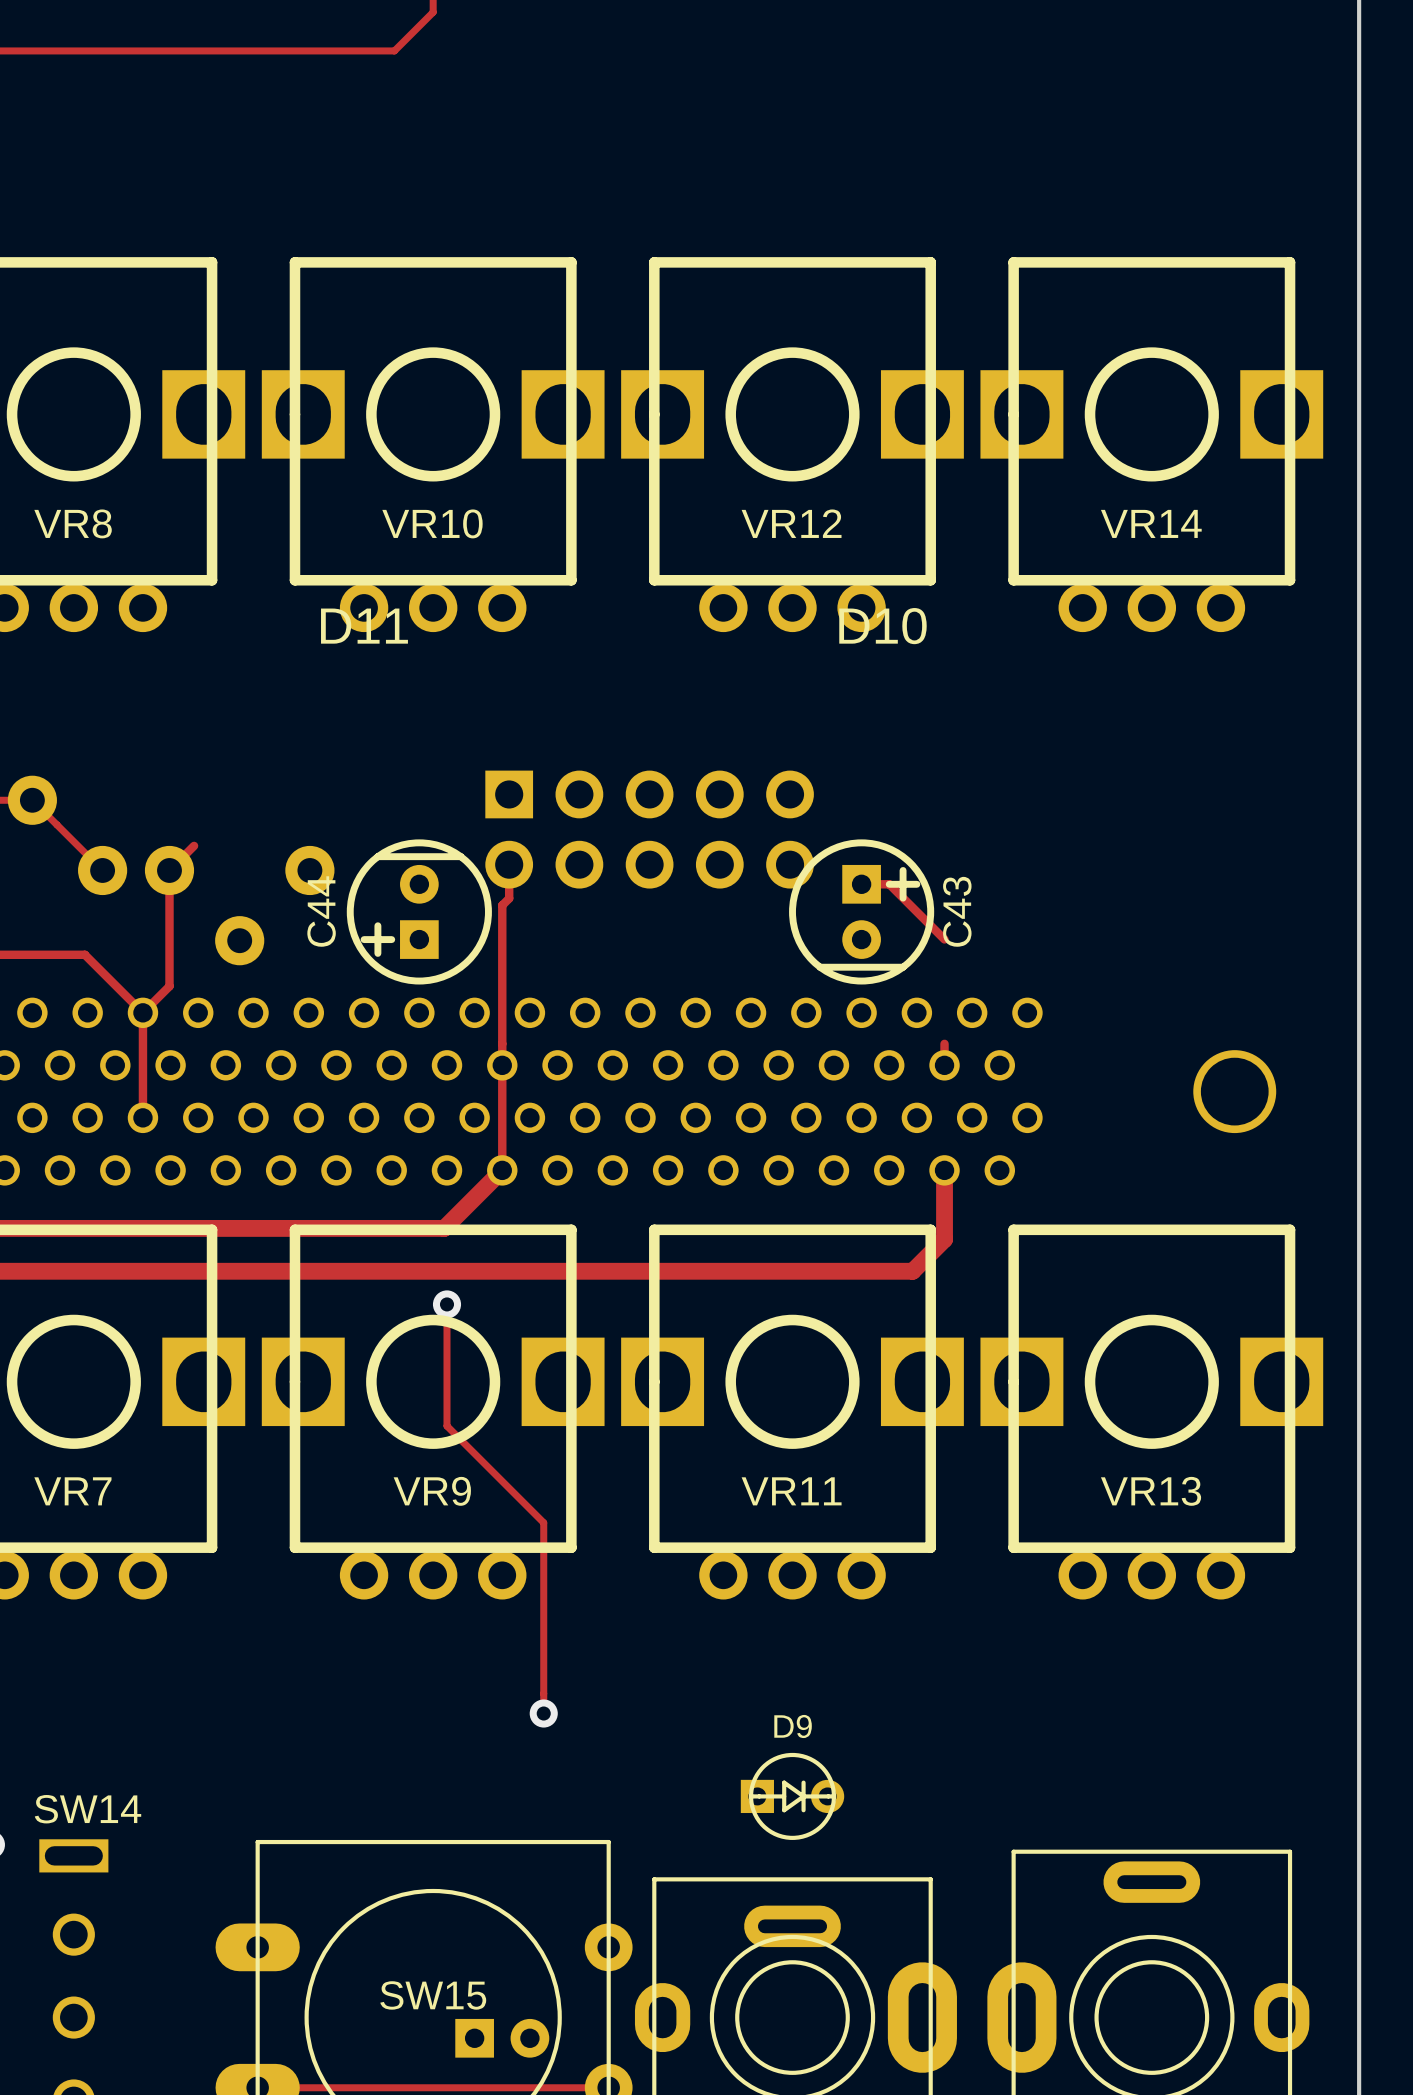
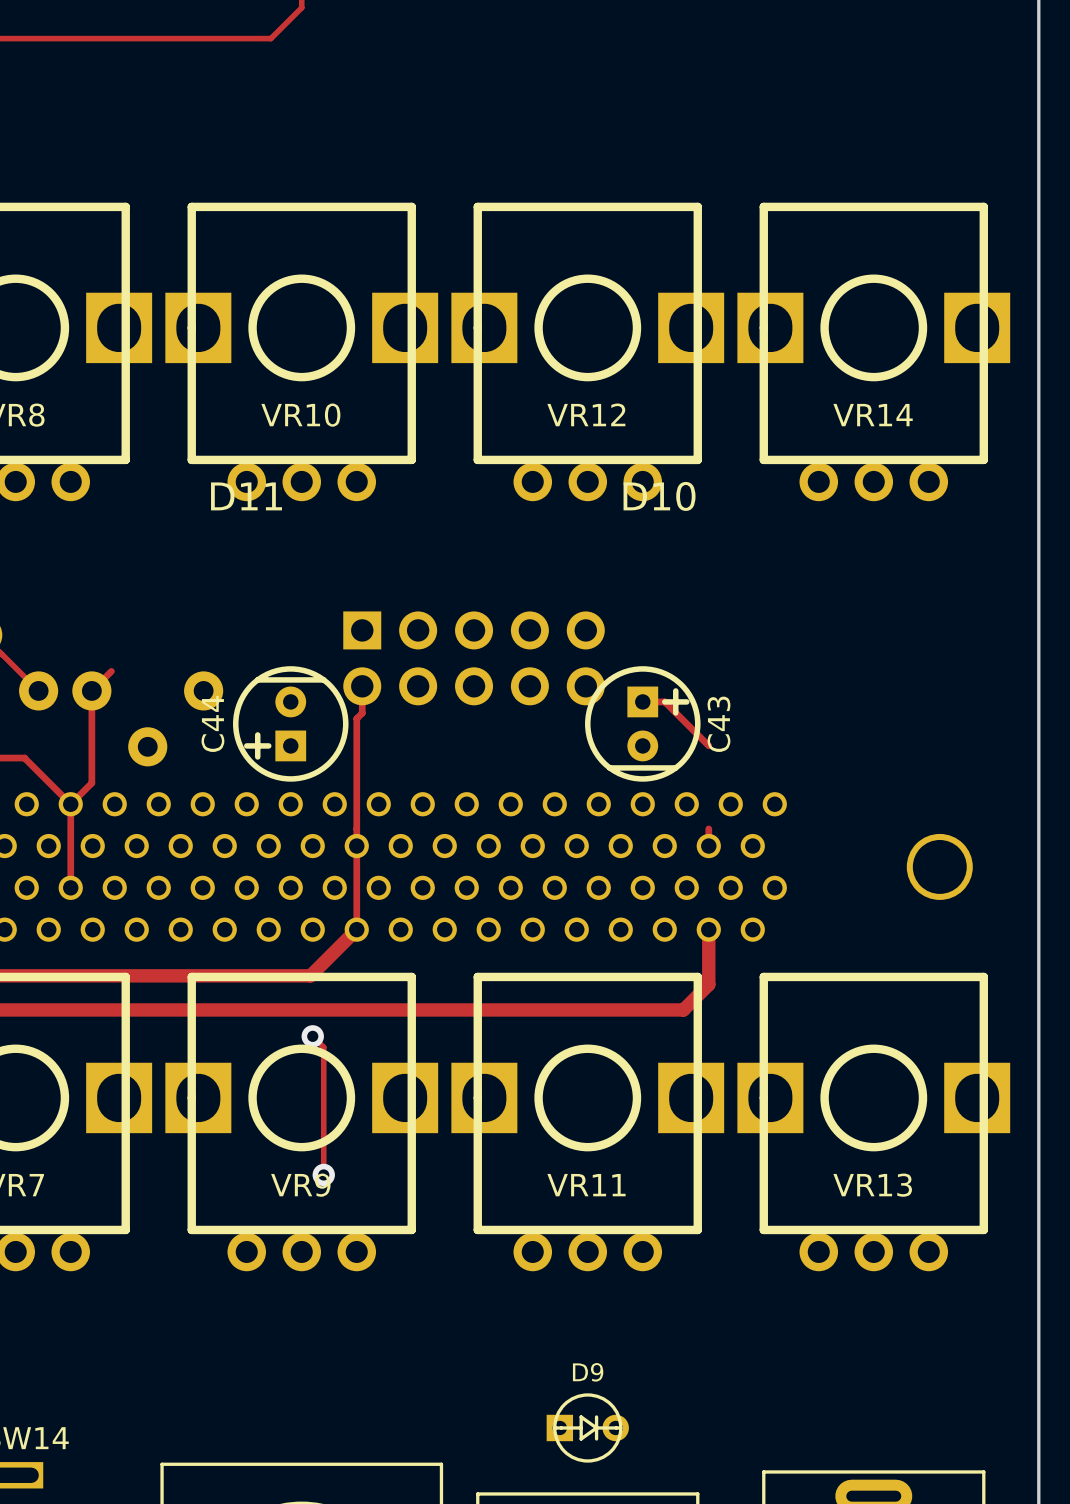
track: (447, 1304) (447, 1426) (543, 1522) (543, 1713) -> (312, 1036) (323, 1047) (323, 1174)
via: none -> (323, 1174)
via: (543, 1713) -> none

